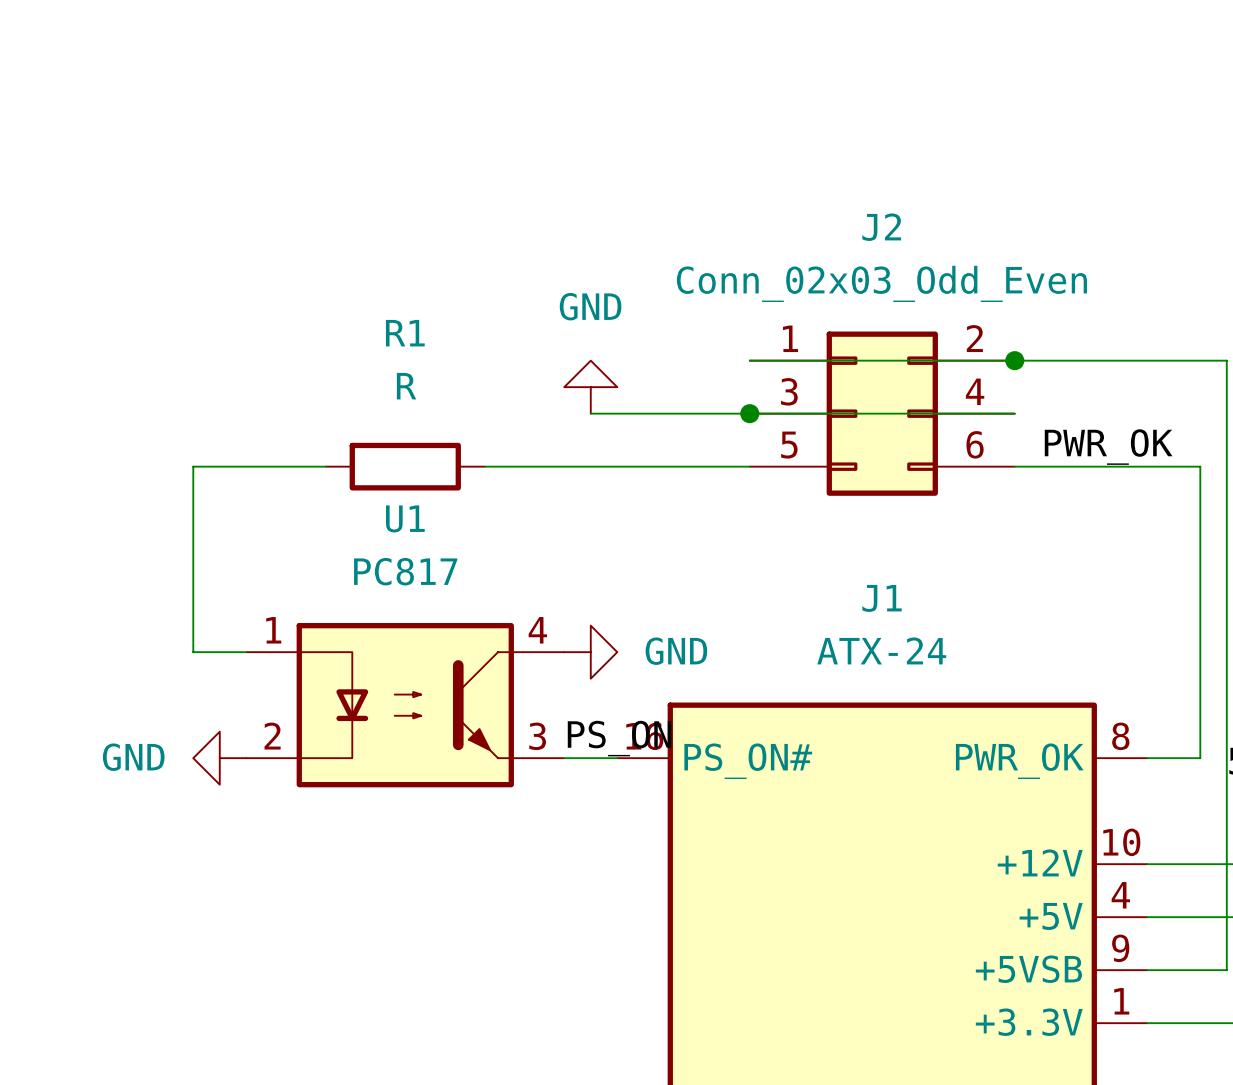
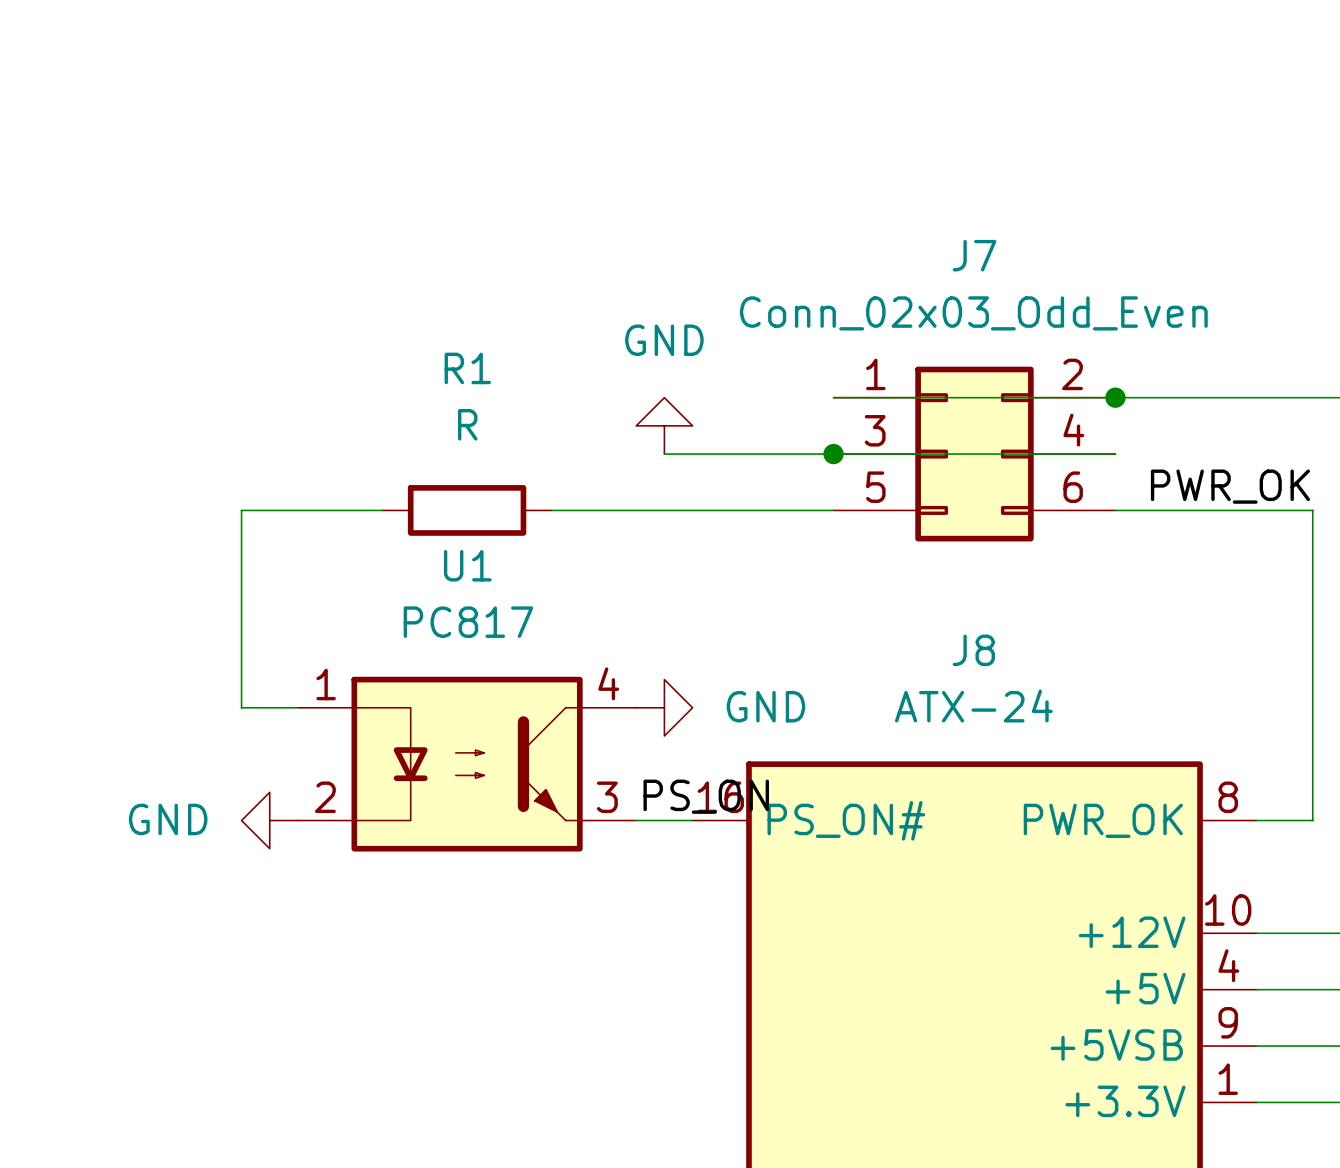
J2 name: J2 (881, 227) -> J7 (974, 255)
J1 name: J1 (882, 598) -> J8 (973, 650)

